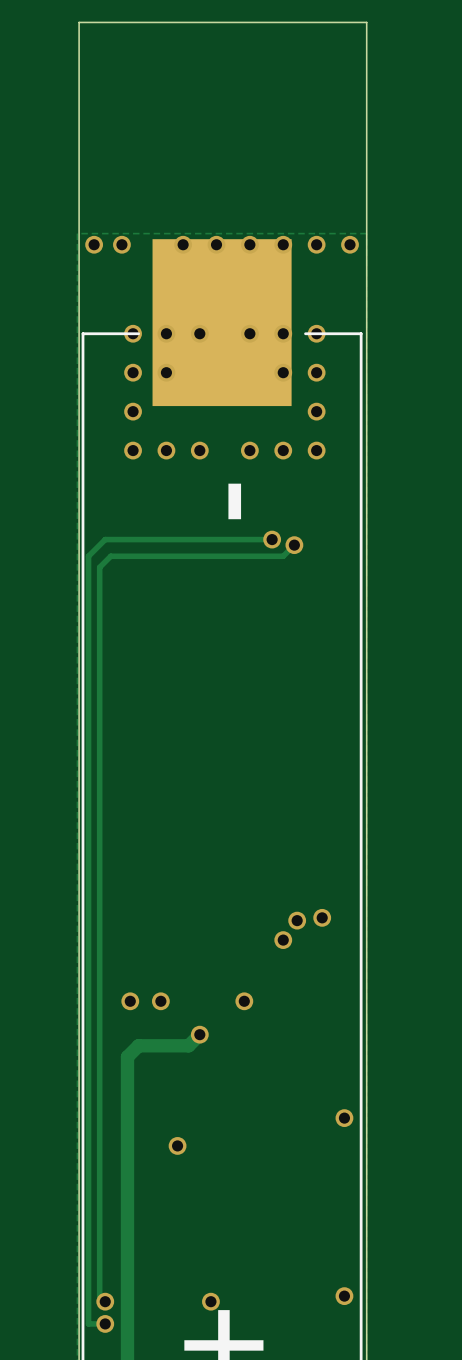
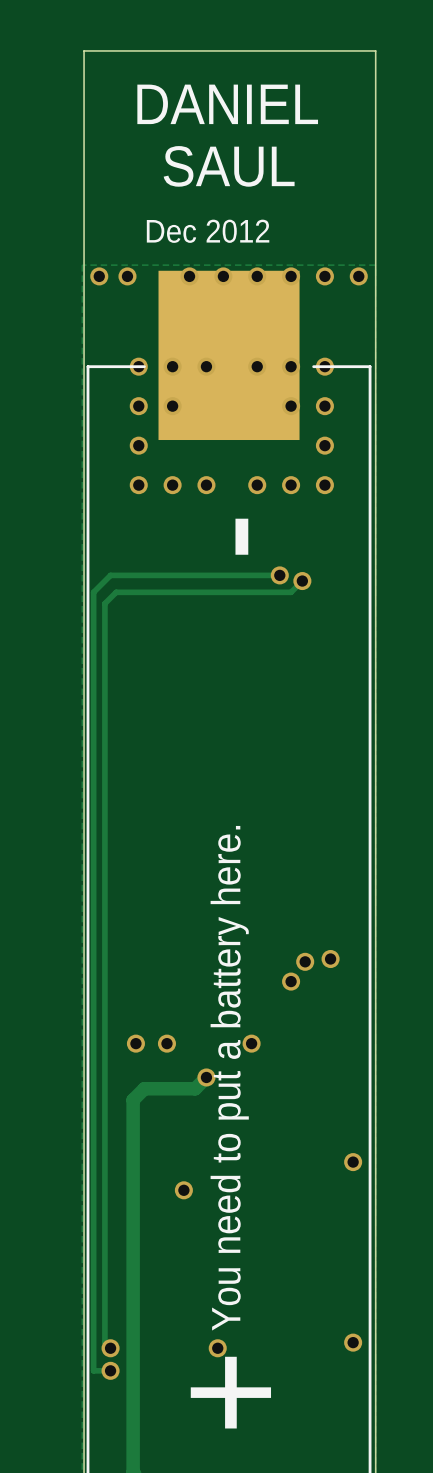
text: none -> DANIEL (227, 104)
text: none -> SAUL (229, 166)
text: none -> Dec 2012 (208, 231)
text: none -> You need to put a battery here. (229, 1078)

